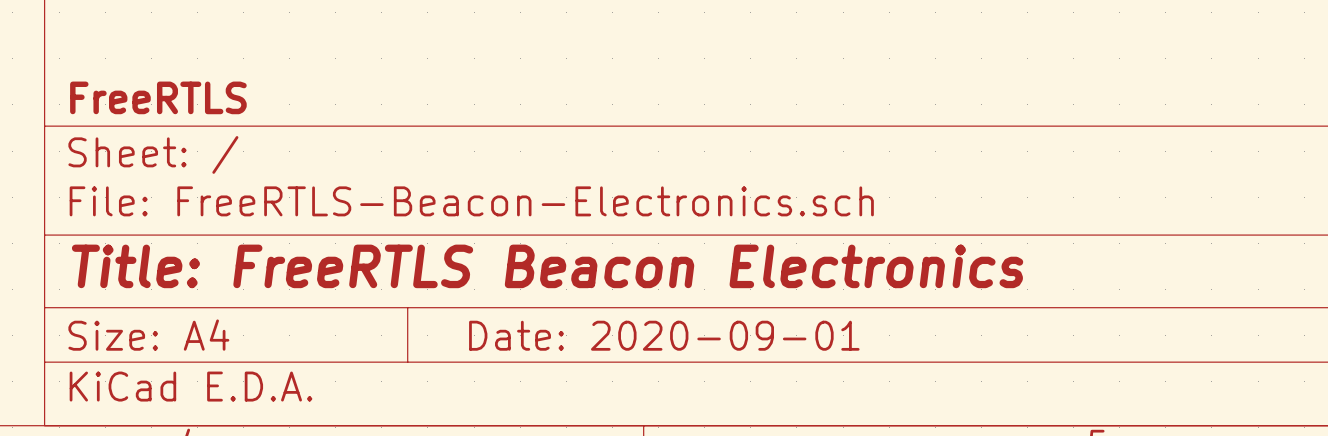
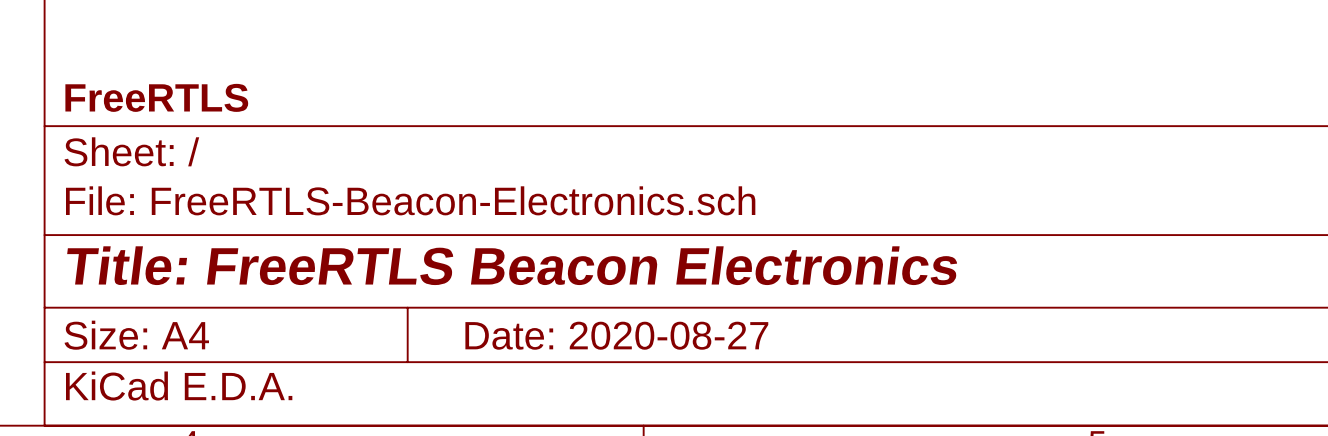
title block: Date: 2020-09-01 (664, 335) -> Date: 2020-08-27 (616, 335)

